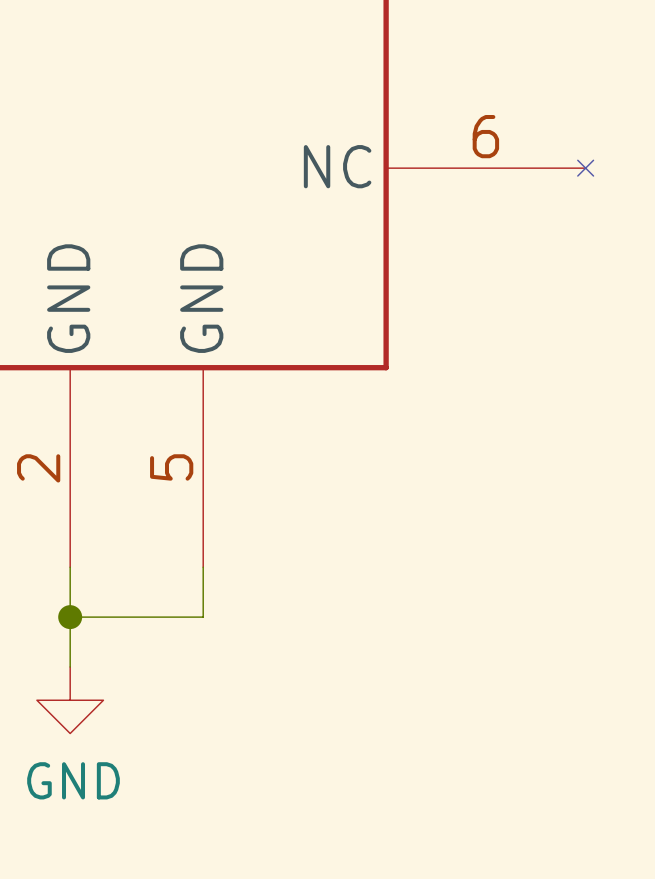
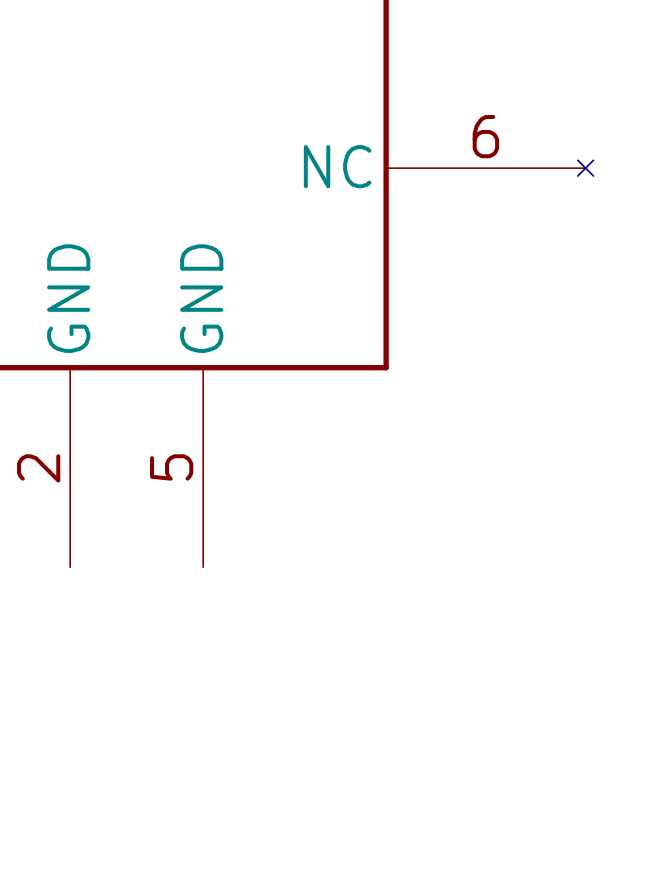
wire: (70, 567) (70, 666) -> none
wire: (203, 567) (203, 617) (70, 617) -> none
junction: (70, 617) -> none
power symbol: GND (70, 700) -> none

